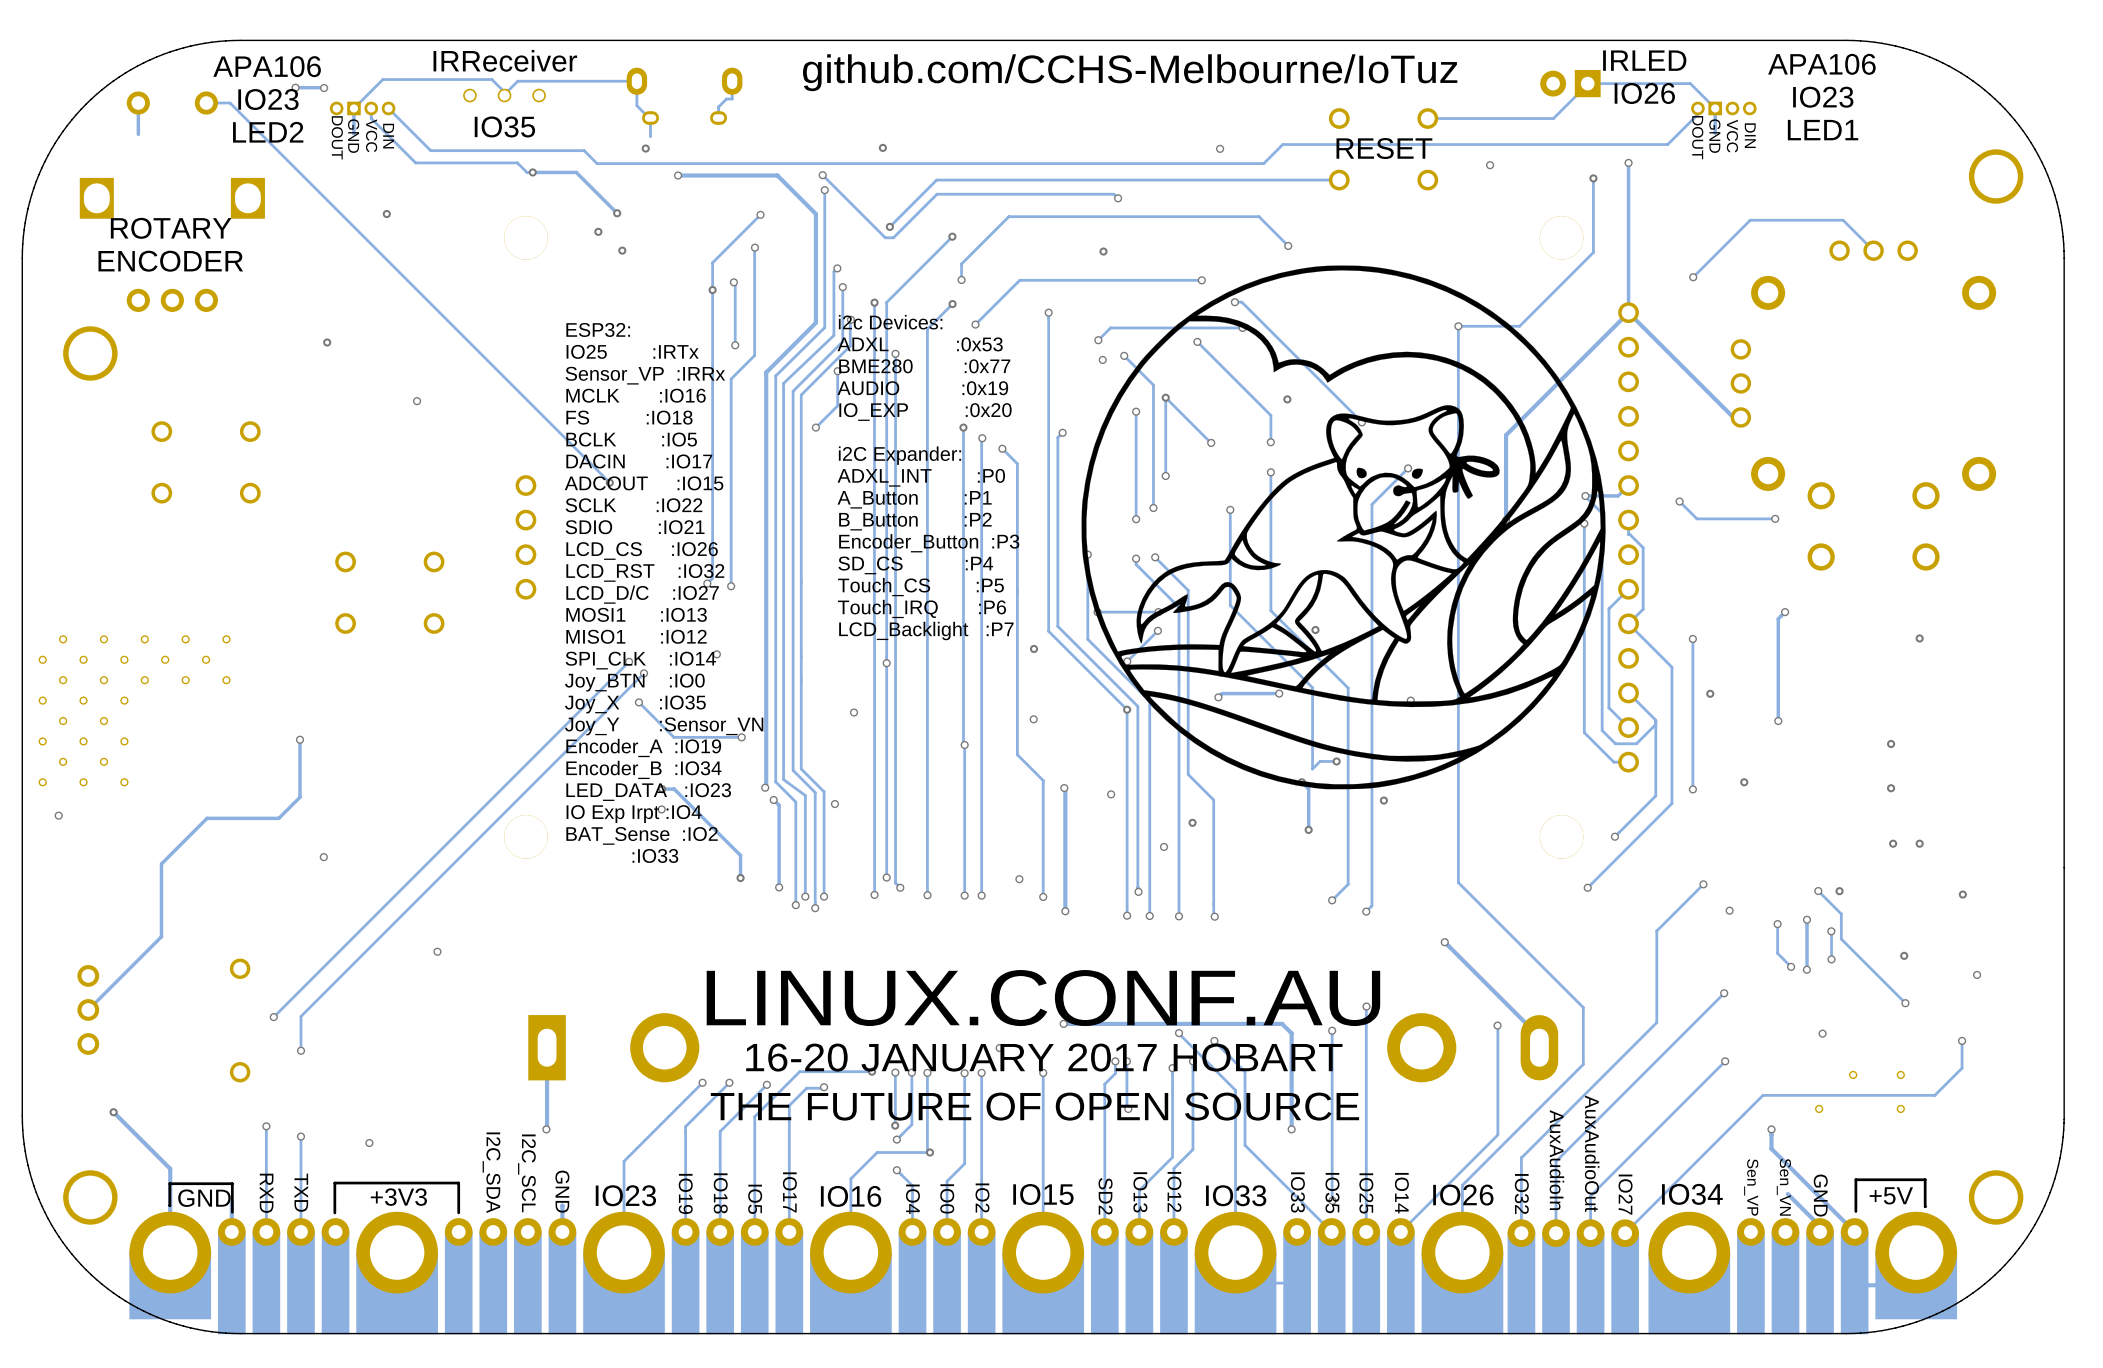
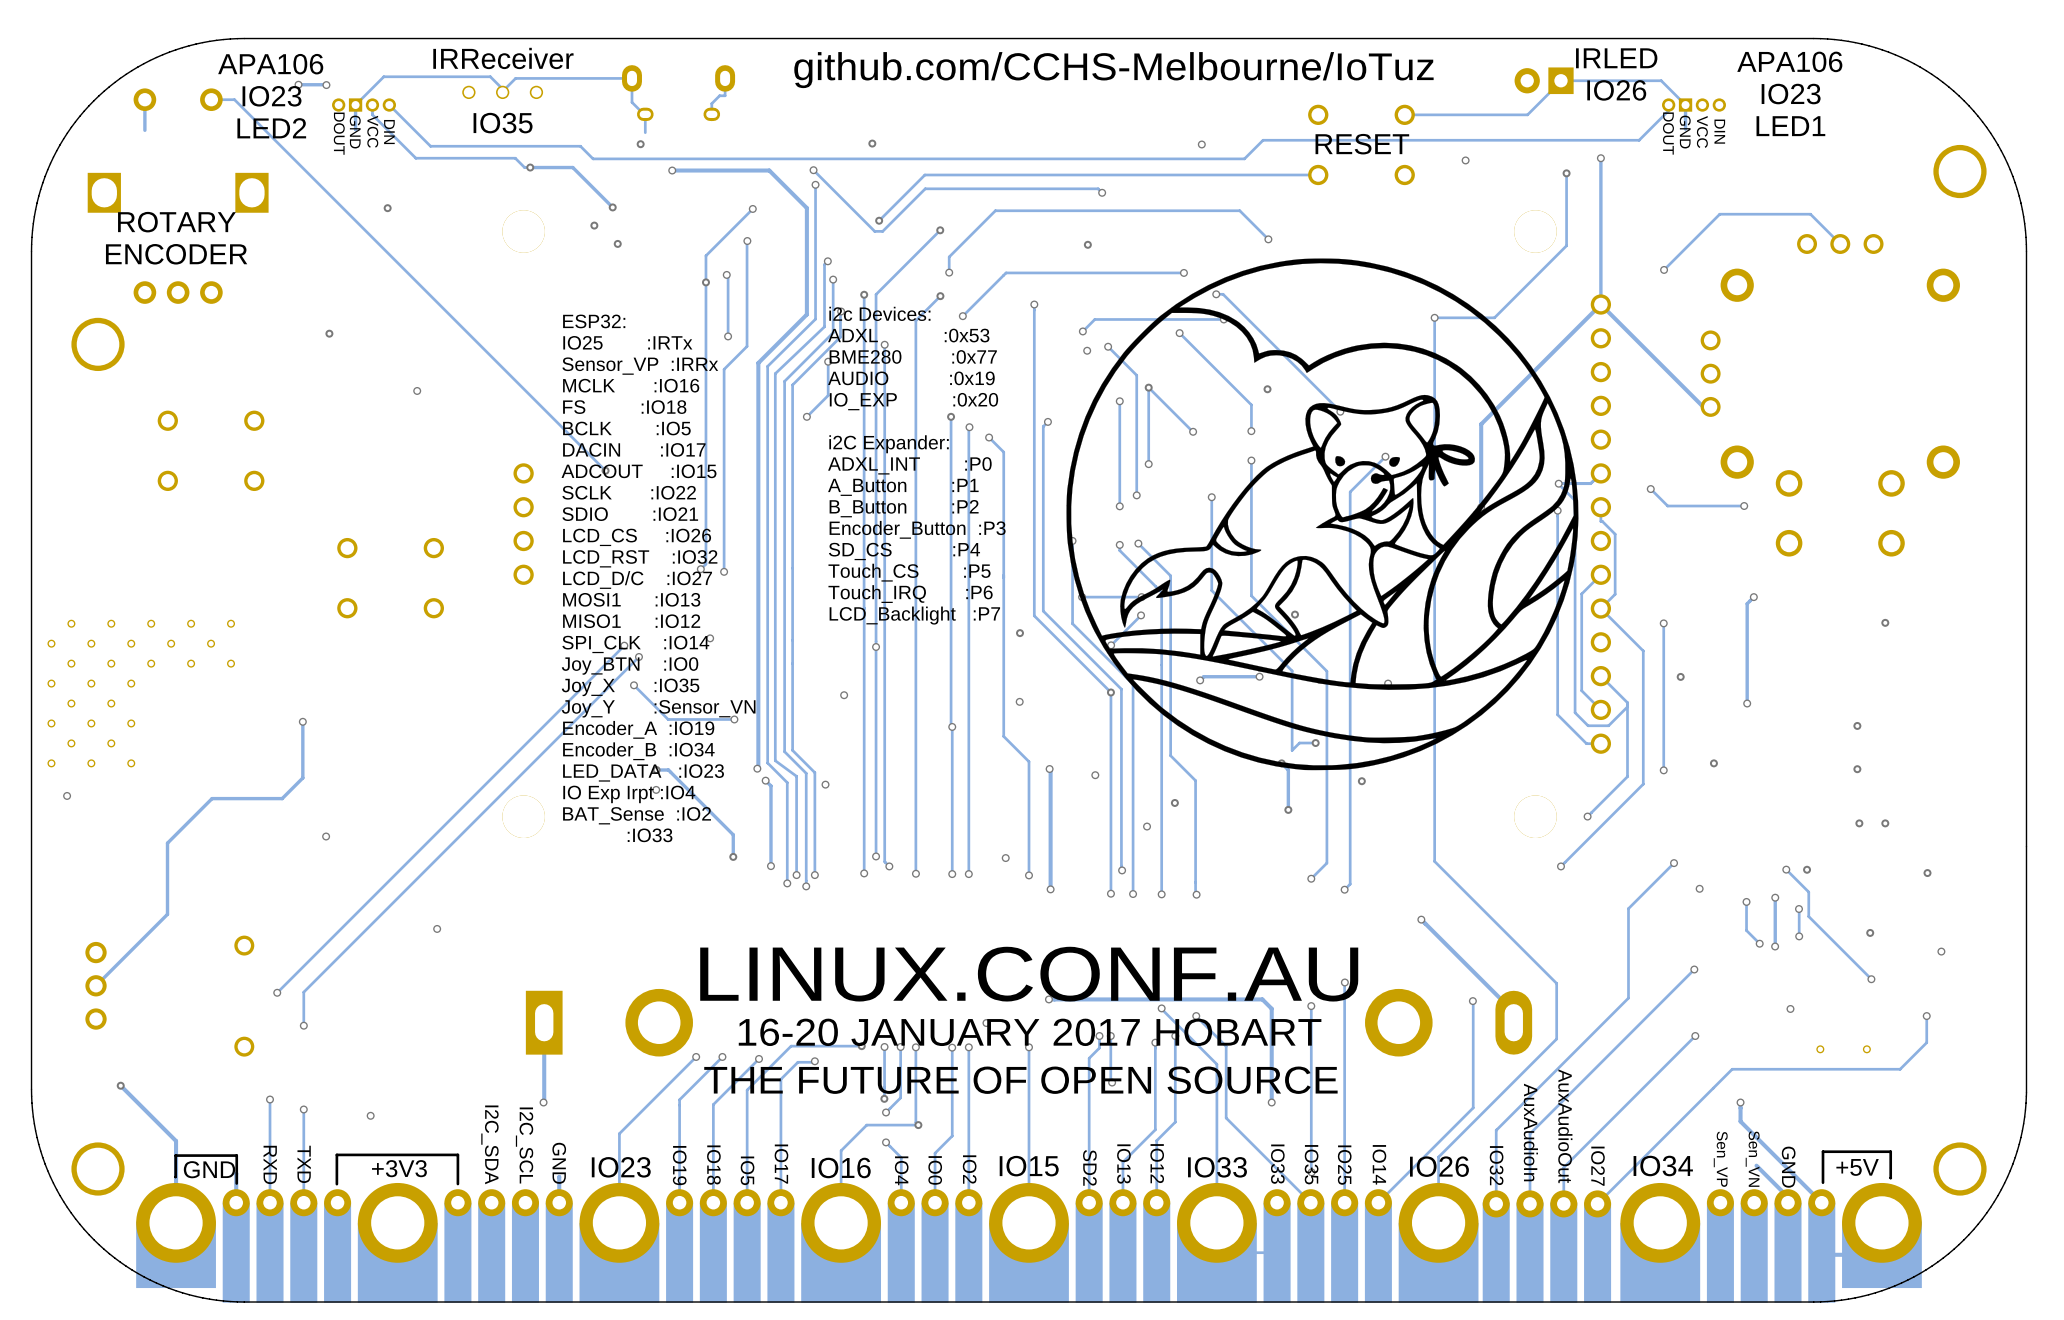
part: (1819, 1108) -> none
part: (1900, 1108) -> none

